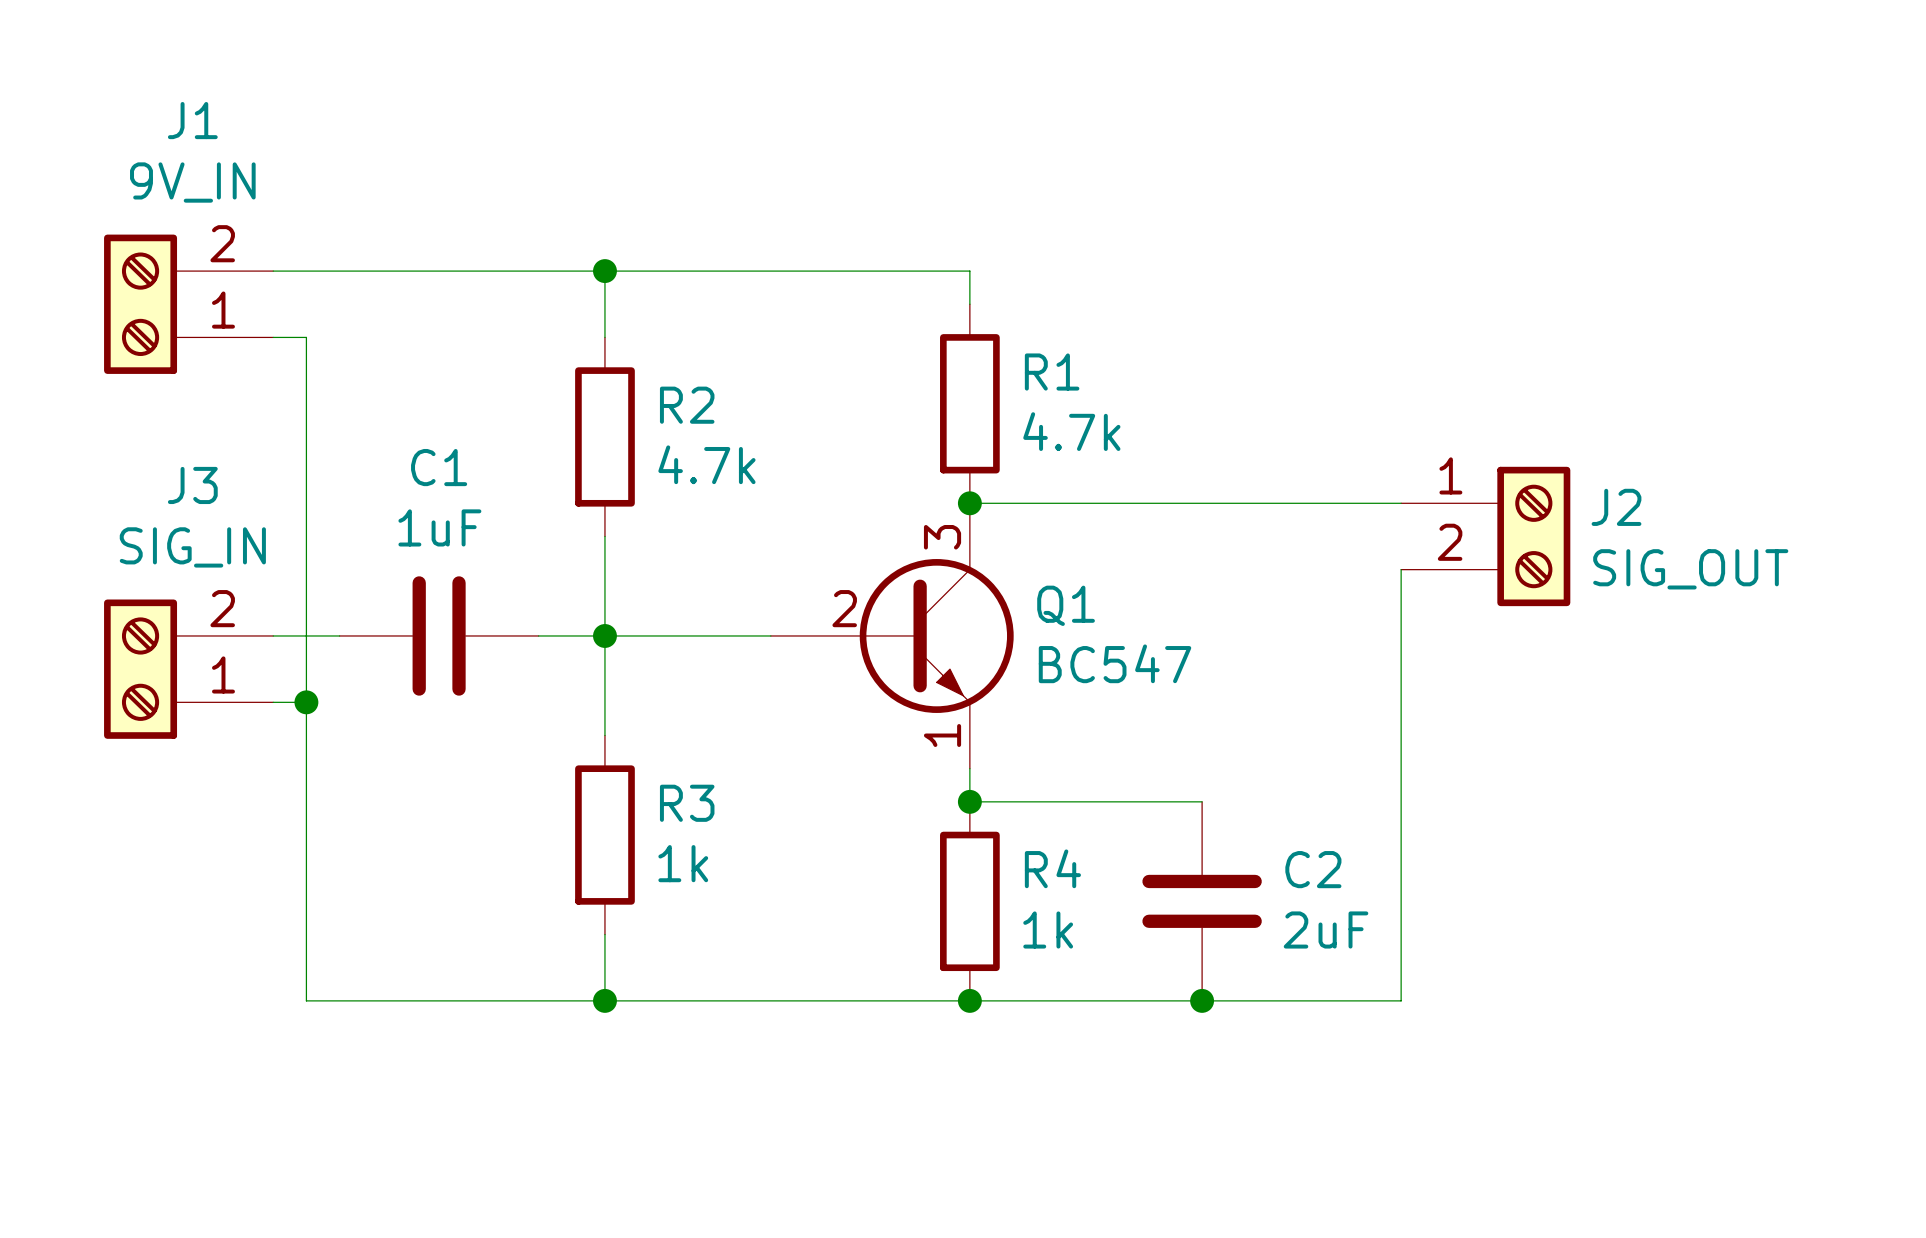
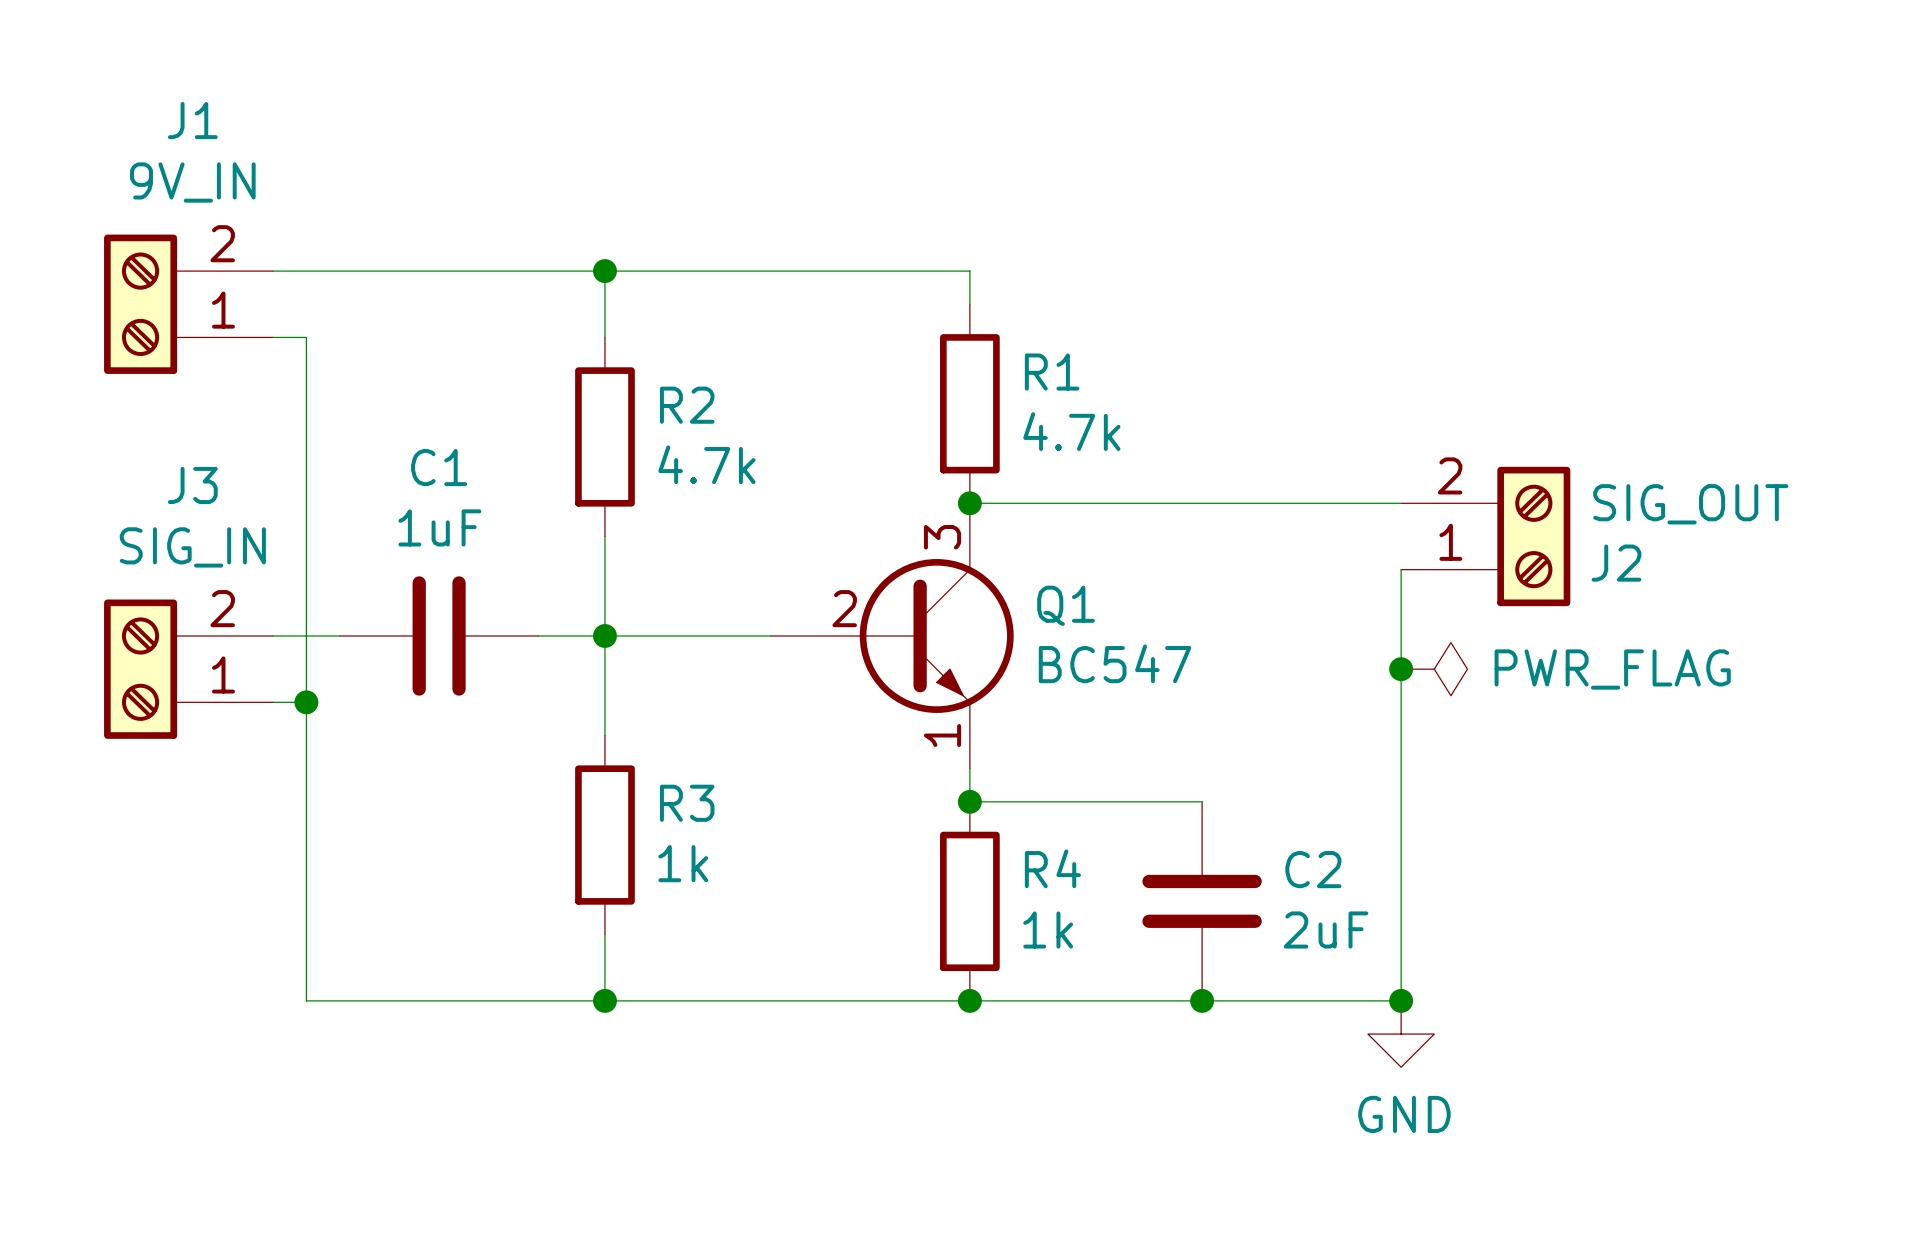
J2 flip: as is (1533, 536) -> up-down (1533, 536)
junction: none -> (1401, 669)
power symbol: none -> PWR_FLAG (1434, 669)
junction: none -> (1401, 1000)
power symbol: none -> GND (1401, 1034)

